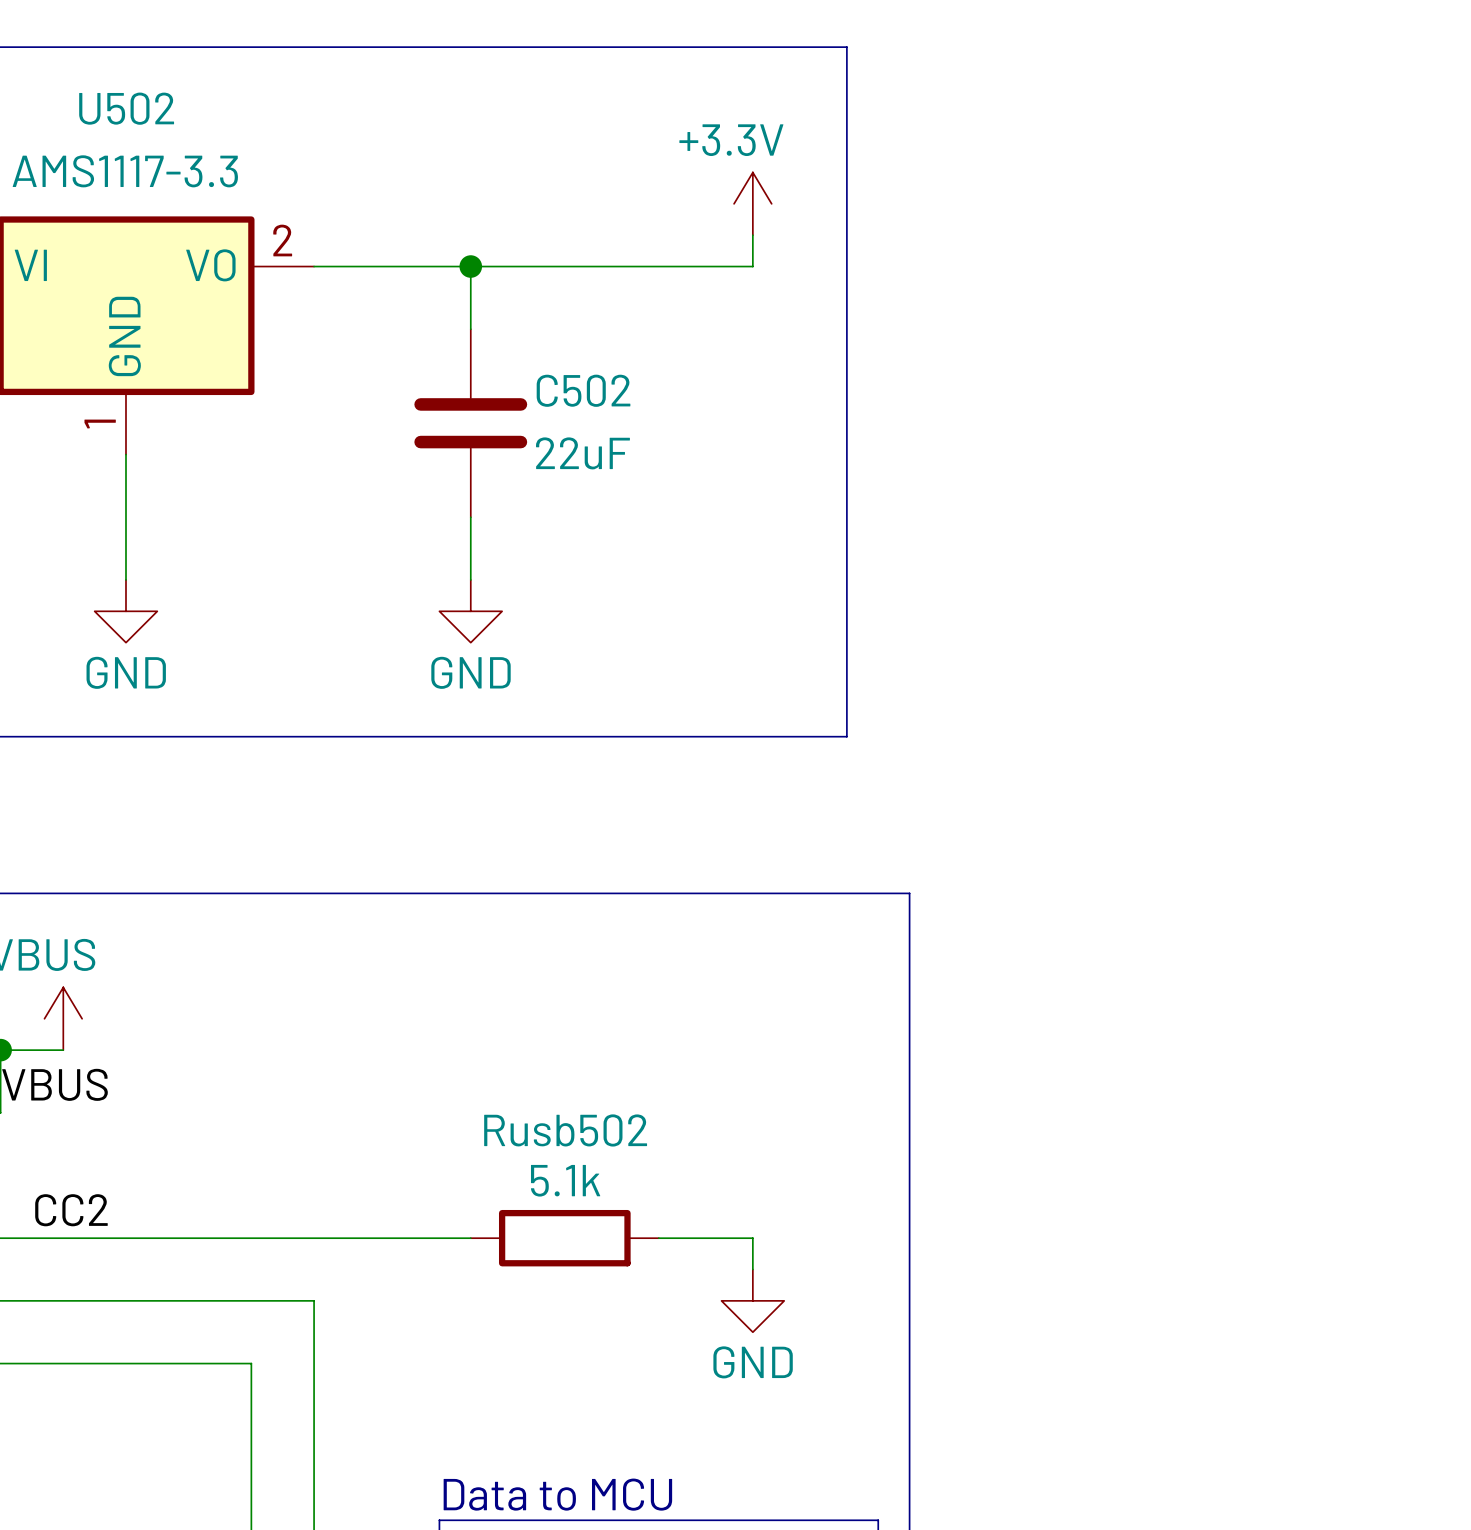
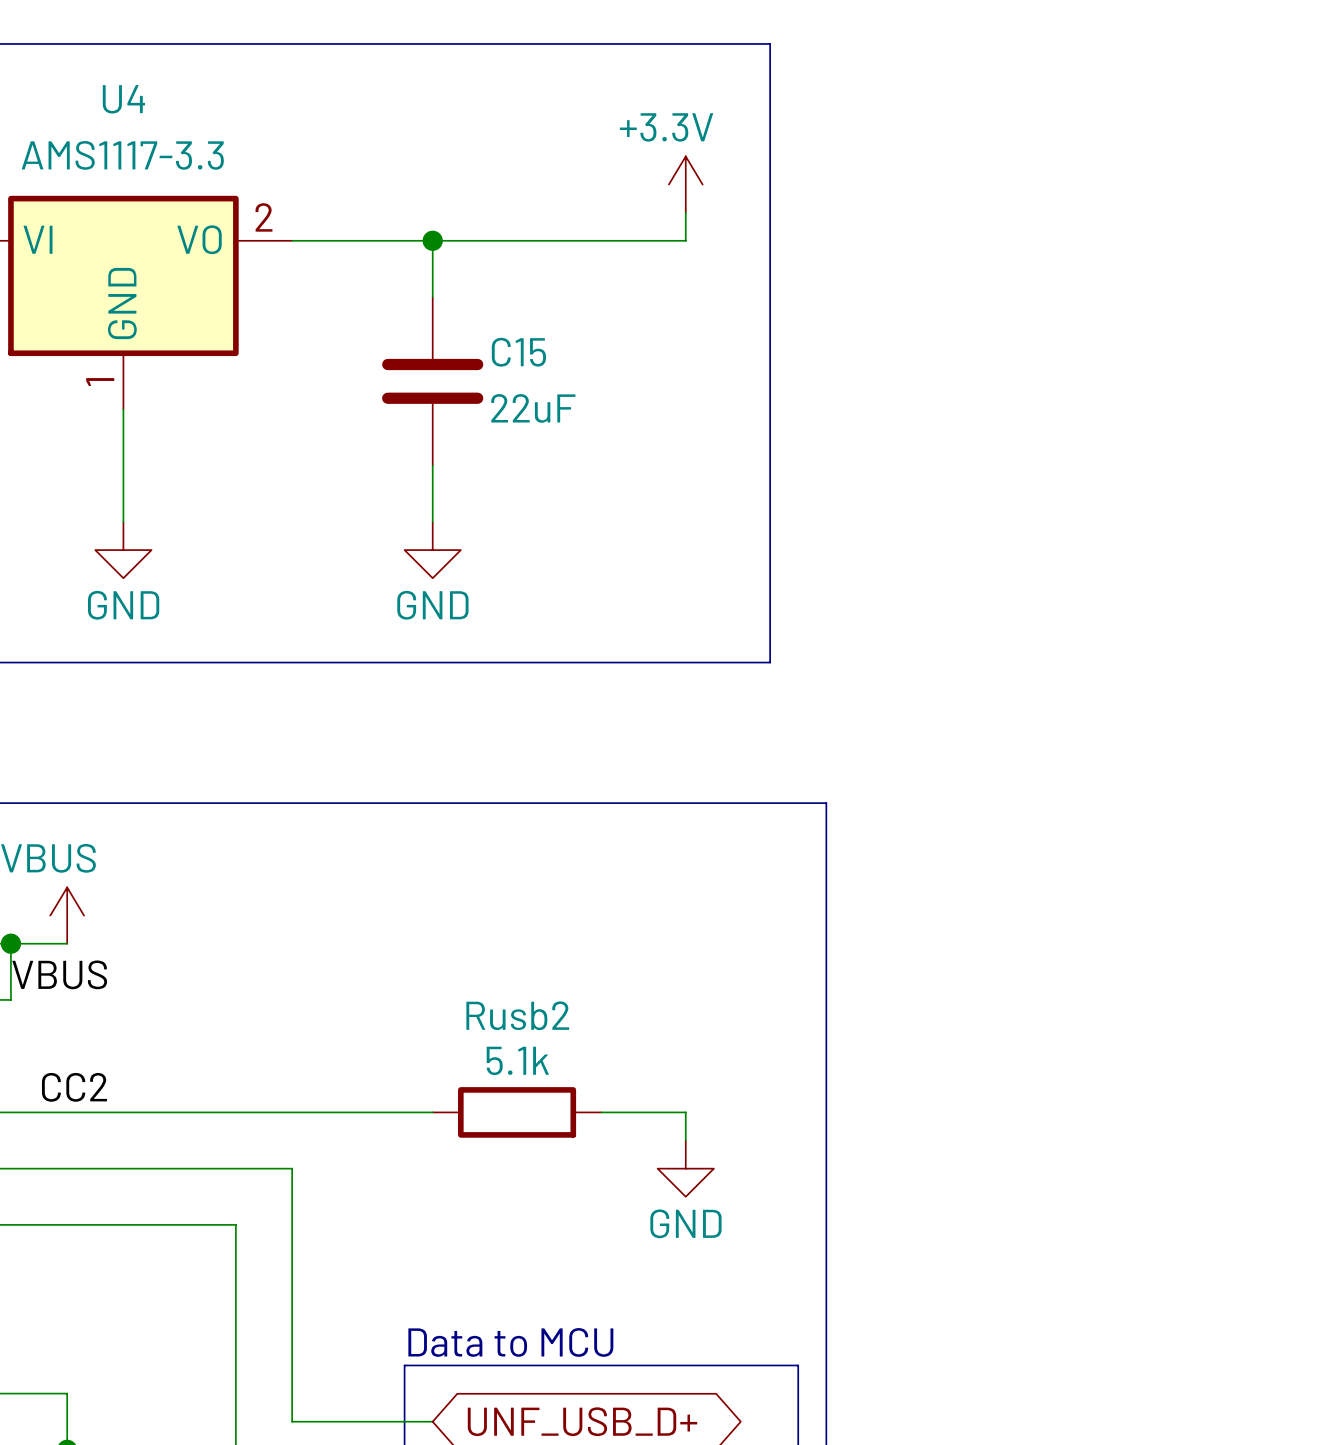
U502 name: U502 (126, 108) -> U4 (123, 99)
C502 name: C502 (583, 390) -> C15 (518, 352)
Rusb502 name: Rusb502 (565, 1130) -> Rusb2 (517, 1015)

